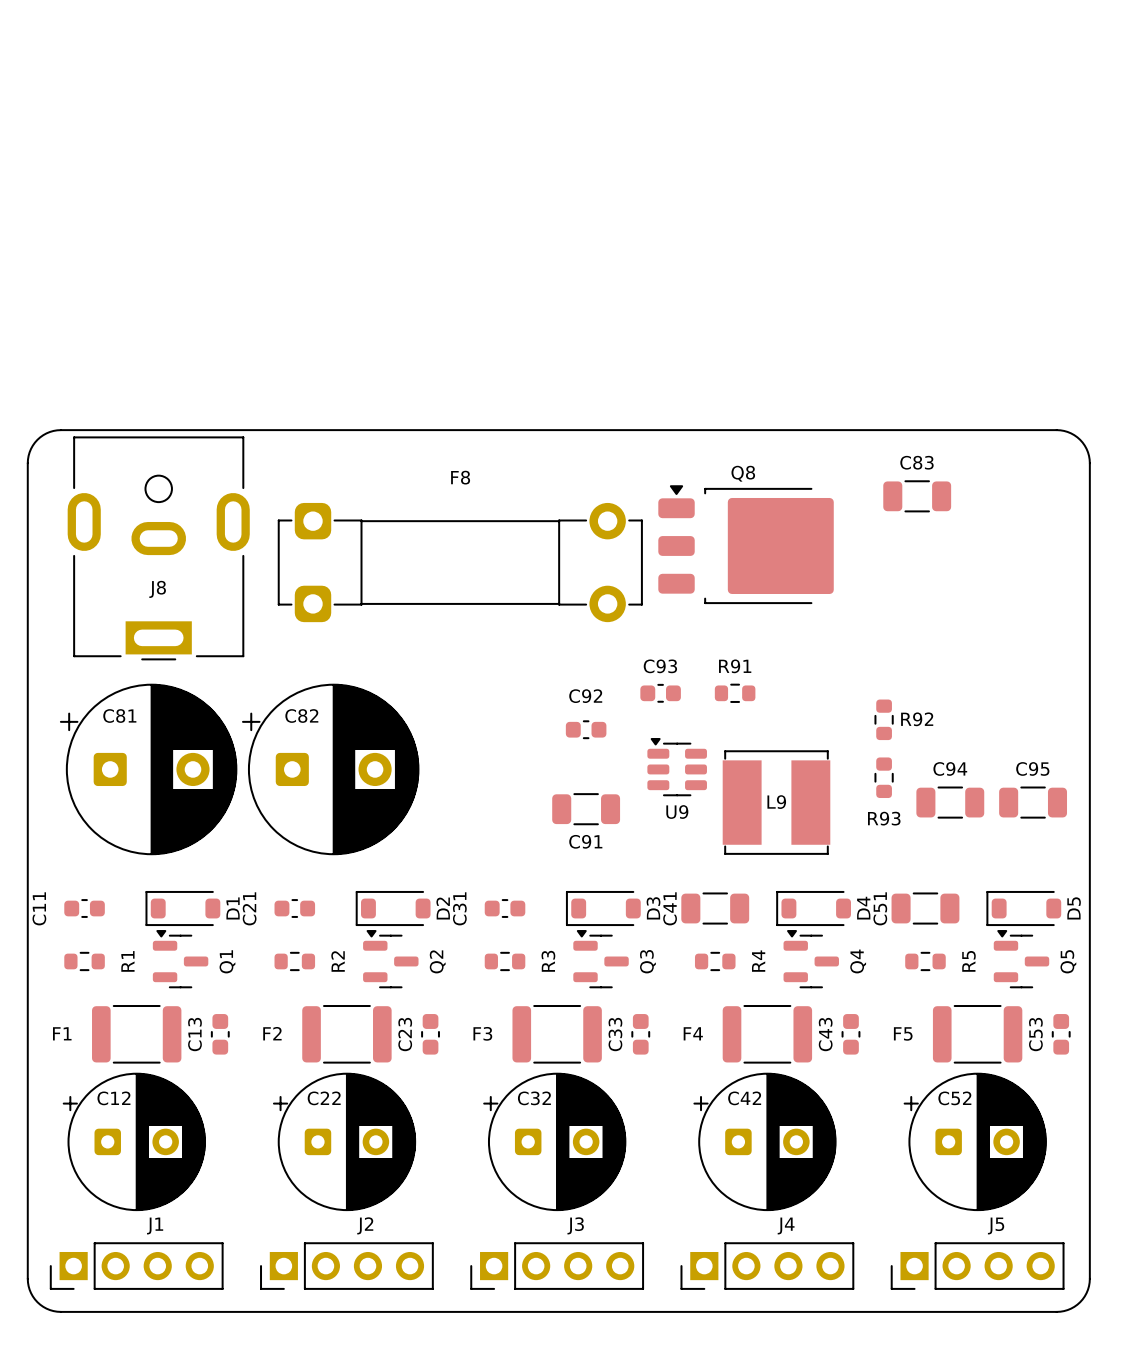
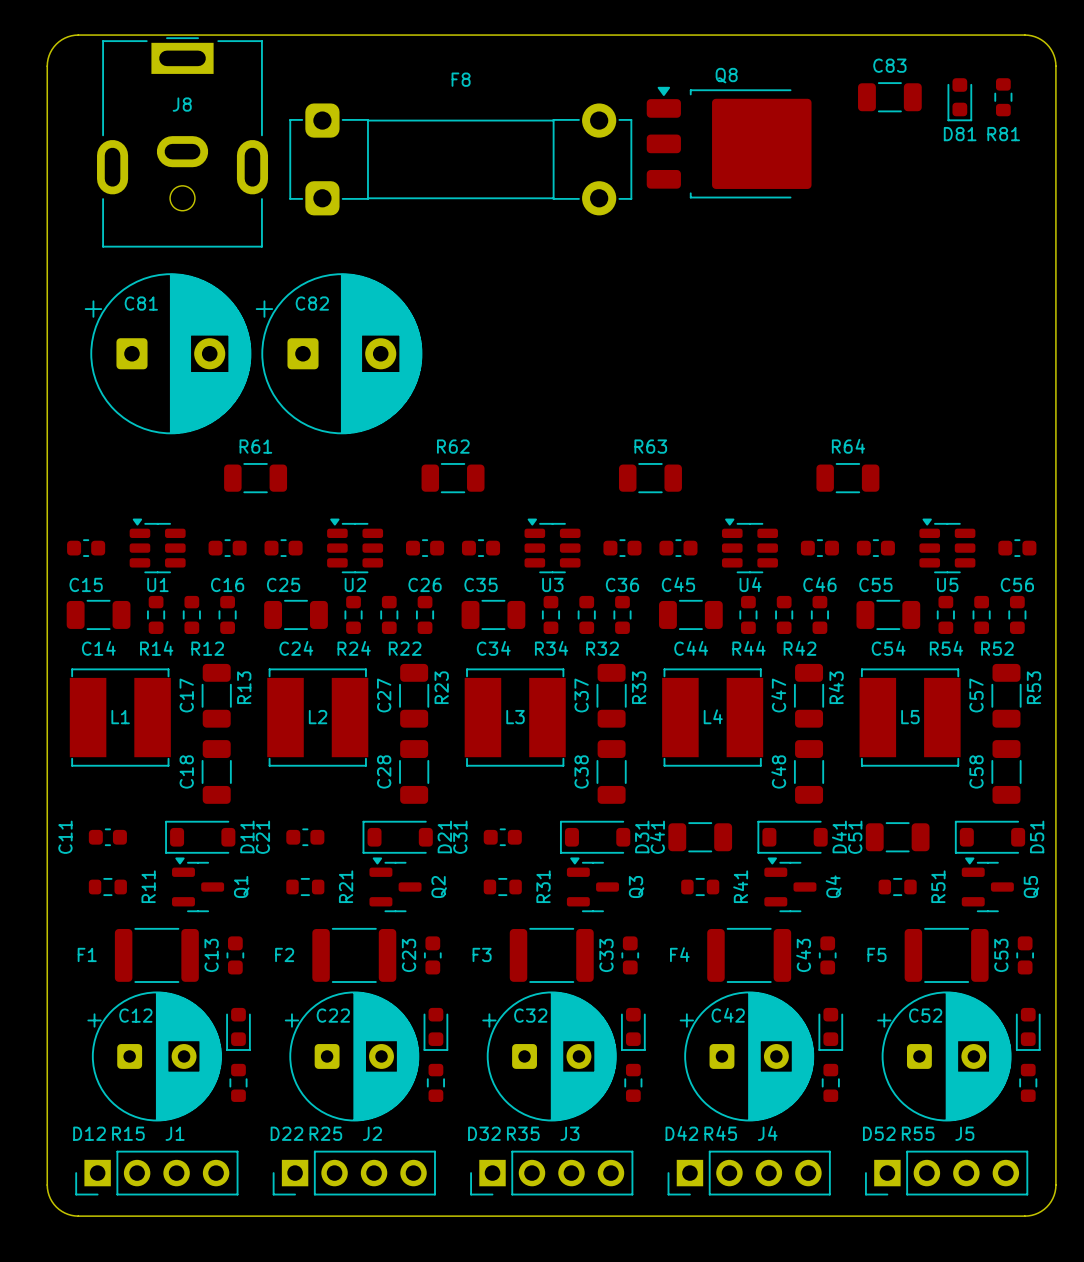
R81: none -> (1003, 97)
D81: none -> (959, 99)
C83 position: (917, 496) -> (889, 97)
R61: none -> (255, 478)
R62: none -> (453, 478)
R63: none -> (650, 478)
R64: none -> (847, 478)
Q8 position: (746, 544) -> (729, 142)
J8 rotation: 0° (158, 548) -> 180° (182, 142)
J8 position: (158, 548) -> (182, 142)
F8 position: (460, 562) -> (460, 159)
U1: none -> (157, 545)
U2: none -> (355, 545)
U3: none -> (552, 545)
U4: none -> (749, 545)
U5: none -> (947, 545)
C15: none -> (86, 548)
C16: none -> (227, 548)
C25: none -> (283, 548)
C26: none -> (425, 548)
C35: none -> (481, 548)
C36: none -> (622, 548)
C45: none -> (678, 548)
C46: none -> (819, 548)
C55: none -> (875, 548)
C56: none -> (1017, 548)
C14: none -> (98, 614)
R14: none -> (156, 614)
R12: none -> (191, 614)
R13: none -> (227, 614)
C24: none -> (296, 614)
R24: none -> (353, 614)
R22: none -> (389, 614)
R23: none -> (425, 614)
C34: none -> (493, 614)
R34: none -> (550, 614)
R32: none -> (586, 614)
R33: none -> (622, 614)
C44: none -> (690, 614)
R44: none -> (748, 614)
R42: none -> (784, 614)
R43: none -> (819, 614)
C54: none -> (888, 614)
R54: none -> (945, 614)
R52: none -> (981, 614)
R53: none -> (1017, 614)
C93: (660, 693) -> none
R91: (735, 693) -> none
R92: (884, 719) -> none
C92: (586, 729) -> none
C17: none -> (216, 695)
C27: none -> (414, 695)
C37: none -> (611, 695)
C47: none -> (809, 695)
C57: none -> (1006, 695)
U9: (677, 767) -> none
C81 position: (148, 769) -> (168, 353)
C82 position: (330, 769) -> (339, 353)
R93: (884, 777) -> none
L1: none -> (120, 717)
L2: none -> (317, 717)
L3: none -> (515, 717)
L4: none -> (712, 717)
L5: none -> (910, 717)
L9: (776, 802) -> none
C94: (950, 802) -> none
C95: (1033, 802) -> none
C91: (586, 809) -> none
C18: none -> (216, 771)
C28: none -> (414, 771)
C38: none -> (611, 771)
C48: none -> (809, 771)
C58: none -> (1006, 771)
D1 name: D1 (233, 908) -> D11 (247, 836)
D2 name: D2 (443, 908) -> D21 (444, 836)
D3 name: D3 (653, 908) -> D31 (642, 836)
D4 name: D4 (863, 908) -> D41 (839, 836)
D5 name: D5 (1074, 908) -> D51 (1037, 836)
R1 name: R1 (127, 961) -> R11 (148, 886)
R2 name: R2 (338, 961) -> R21 (346, 886)
R3 name: R3 (548, 961) -> R31 (543, 886)
R4 name: R4 (758, 961) -> R41 (740, 886)
R5 name: R5 (968, 961) -> R51 (938, 886)
D12: none -> (238, 1029)
D22: none -> (435, 1029)
D32: none -> (633, 1029)
D42: none -> (830, 1029)
D52: none -> (1028, 1029)
R15: none -> (238, 1082)
R25: none -> (435, 1082)
R35: none -> (633, 1082)
R45: none -> (830, 1082)
R55: none -> (1028, 1082)
board edge: (60, 1311) (46, 1308) (37, 1302) (31, 1293) (27, 1278) (27, 463) (29, 452) (37, 439) (49, 431) (60, 430) (1056, 430) (1067, 431) (1077, 437) (1086, 448) (1089, 463) (1089, 1278) (1087, 1289) (1080, 1302) (1071, 1308) (1056, 1311) -> (85, 1216) (71, 1215) (58, 1209) (50, 1198) (47, 1185) (47, 66) (49, 55) (56, 44) (68, 36) (78, 35) (1024, 35) (1038, 38) (1049, 46) (1054, 55) (1055, 66) (1055, 1185) (1052, 1198) (1044, 1209) (1035, 1214) (1020, 1216)

